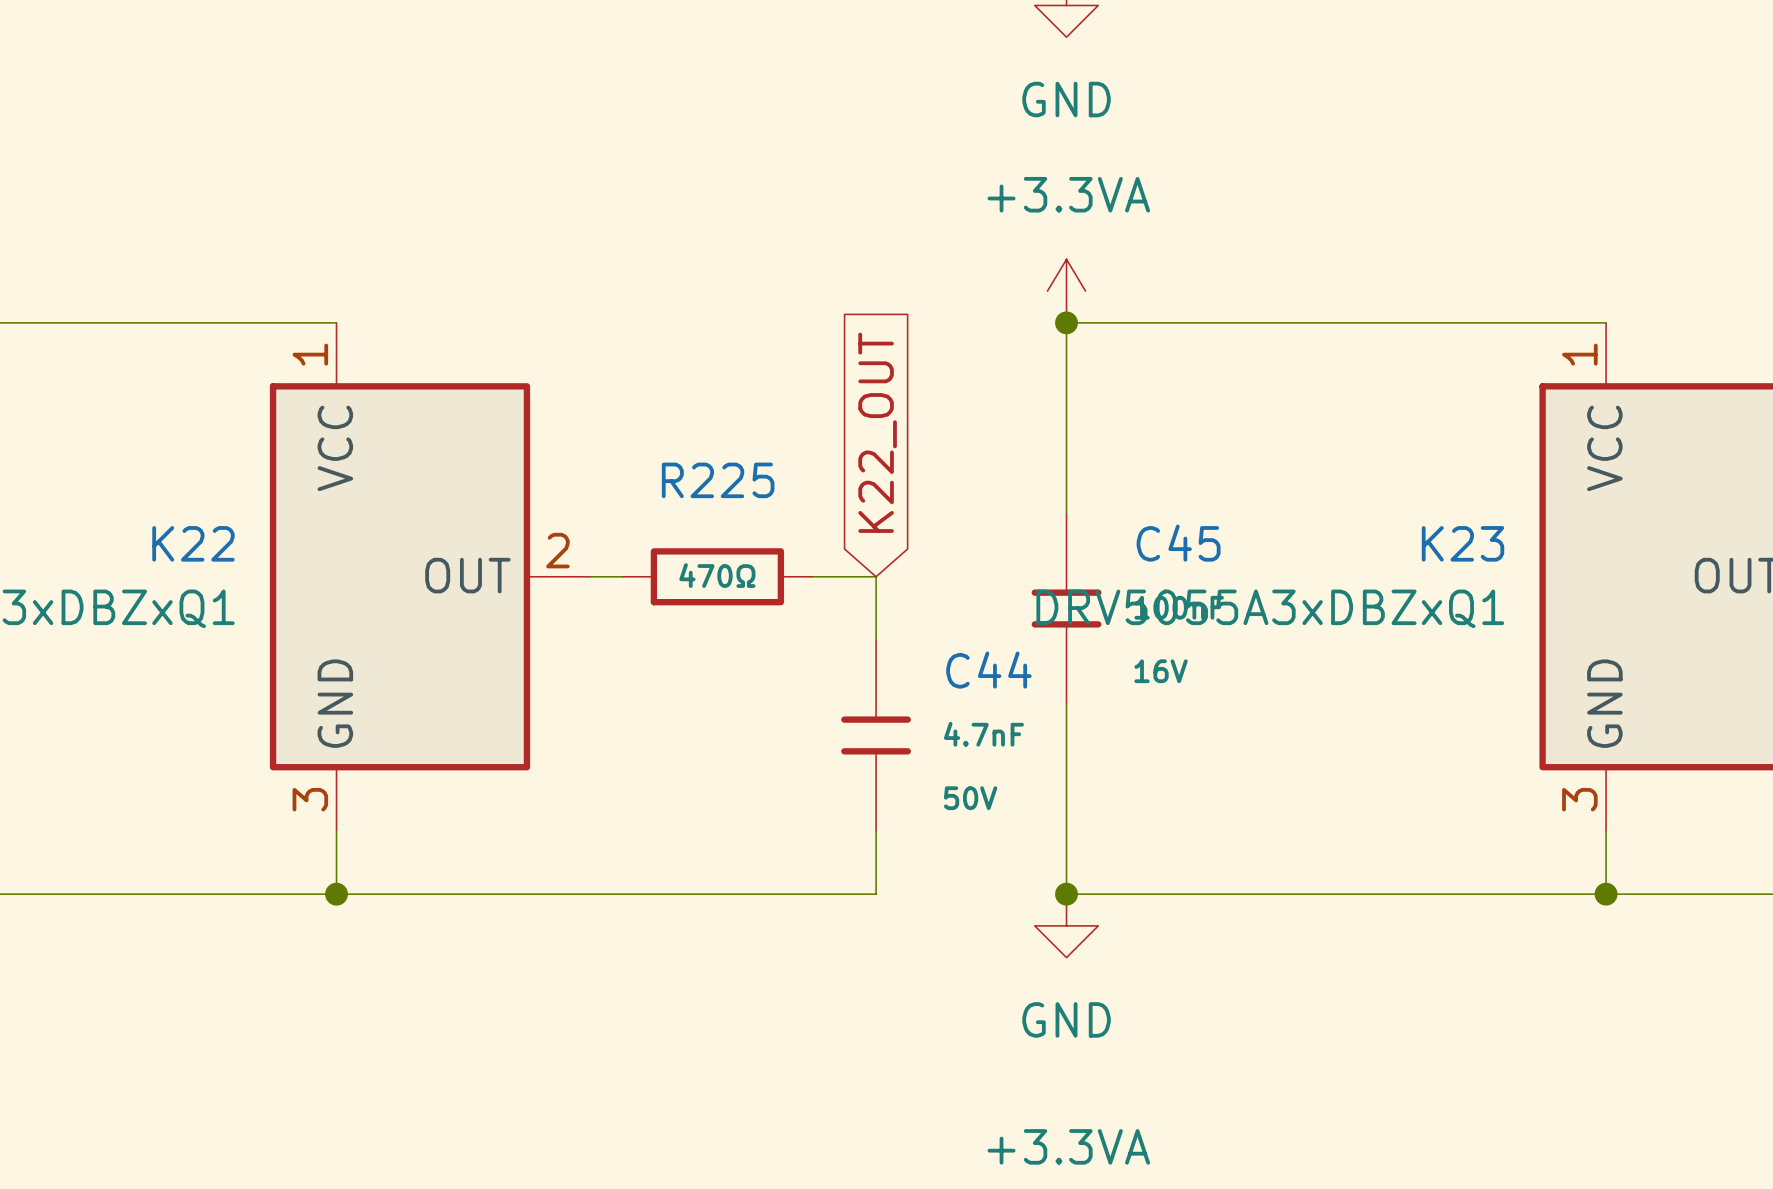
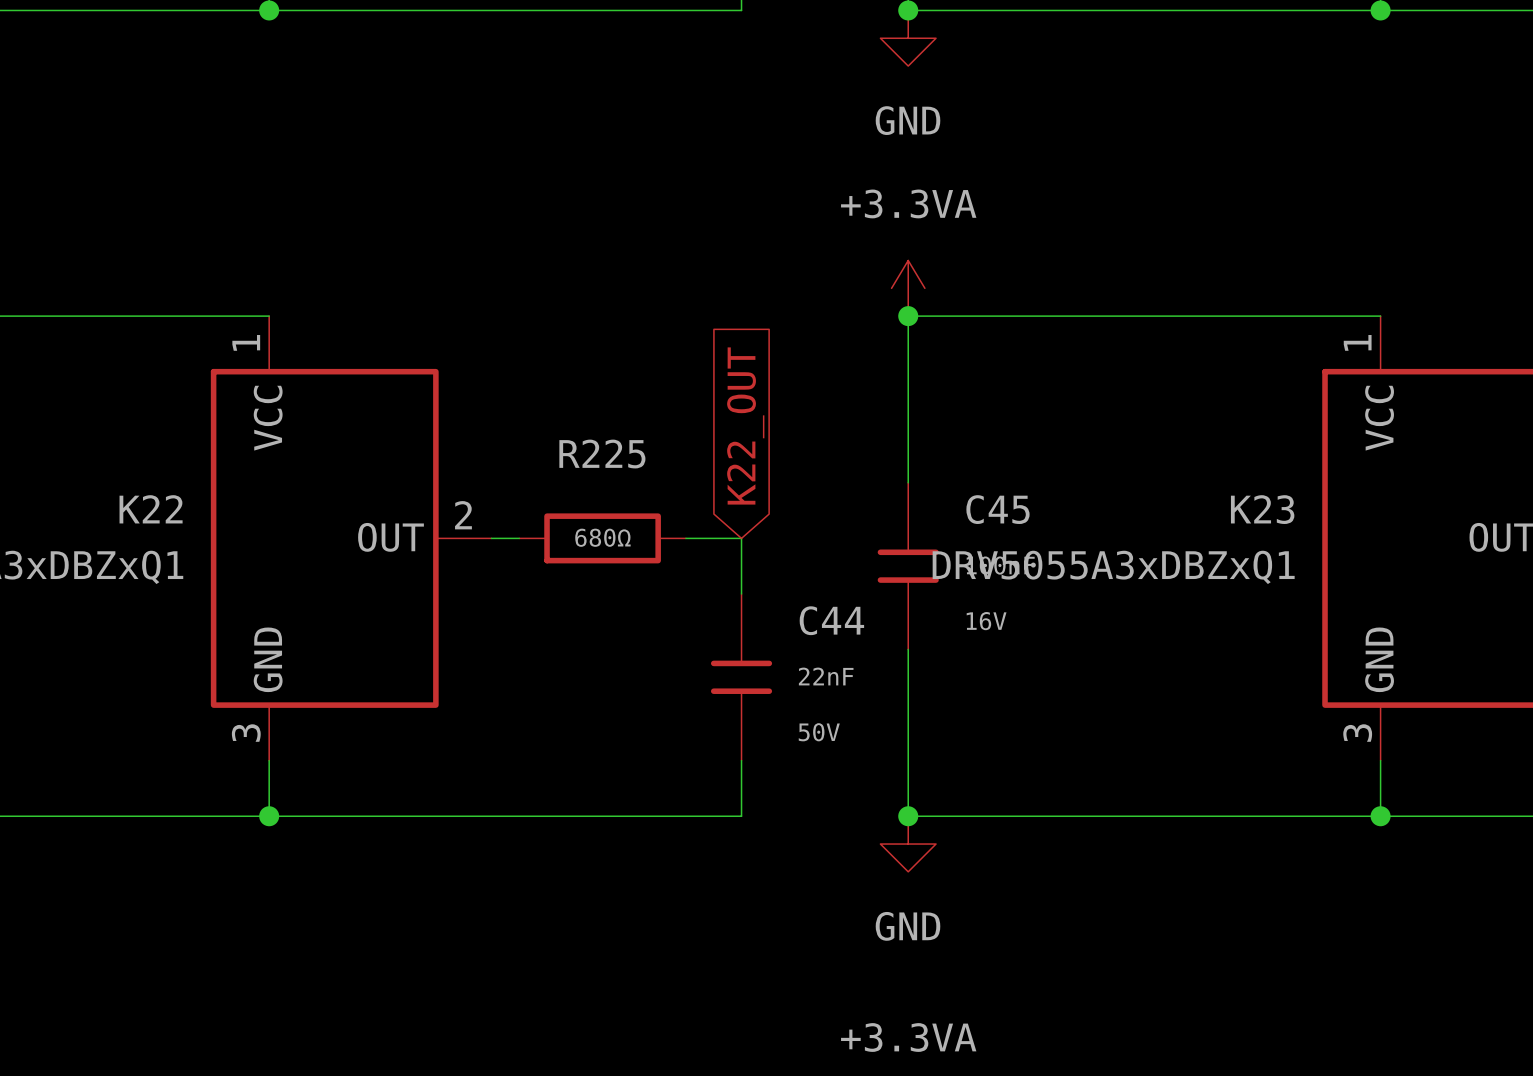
R225 value: 470Ω (717, 575) -> 680Ω (602, 537)
C44 value: 4.7nF (983, 734) -> 22nF (826, 676)

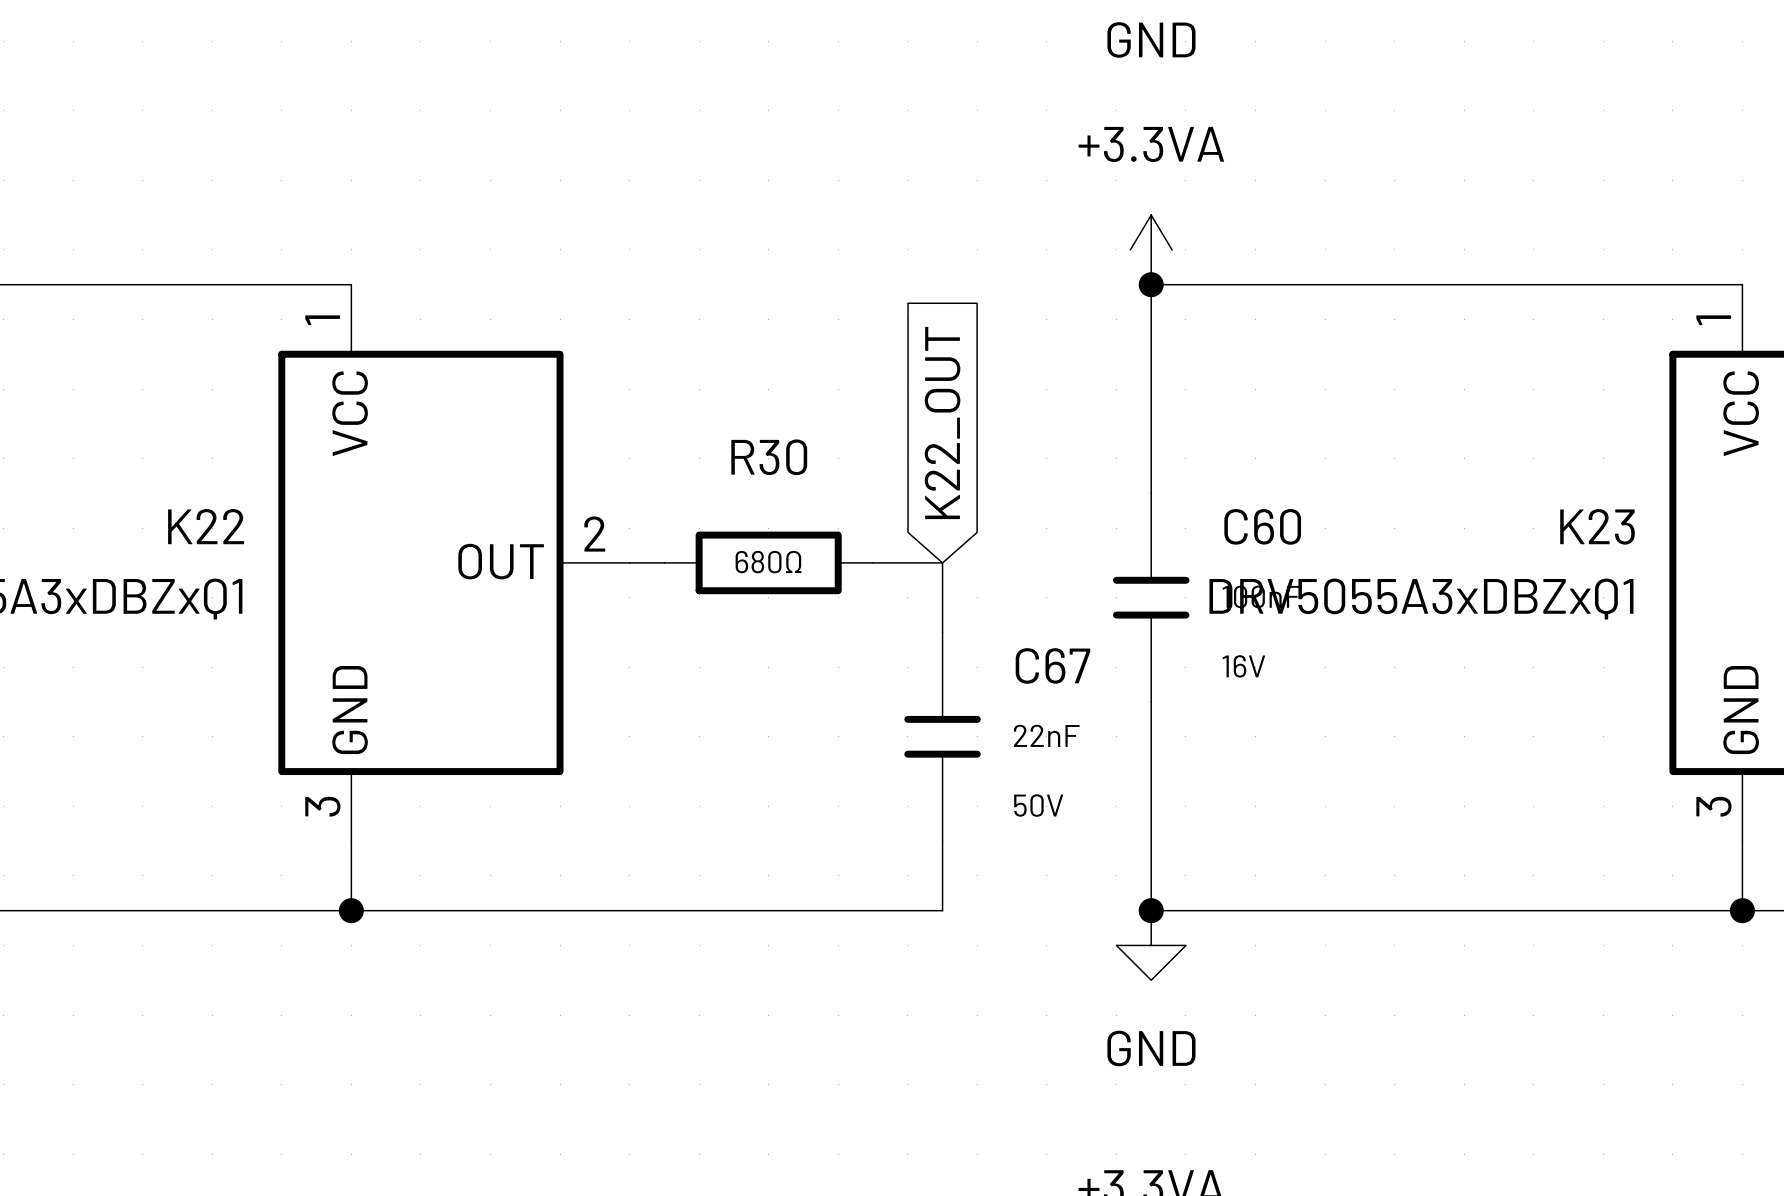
R225 name: R225 (602, 454) -> R30 (769, 457)
C45 name: C45 (997, 509) -> C60 (1262, 526)
C44 name: C44 (831, 620) -> C67 (1052, 665)

